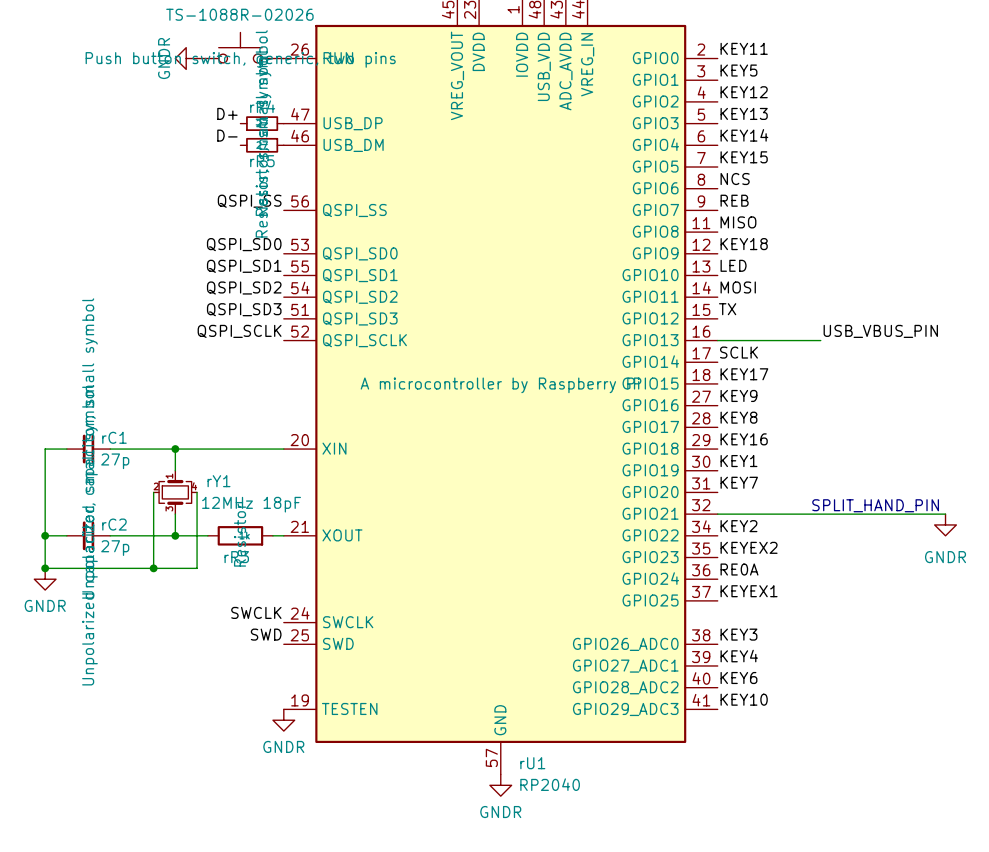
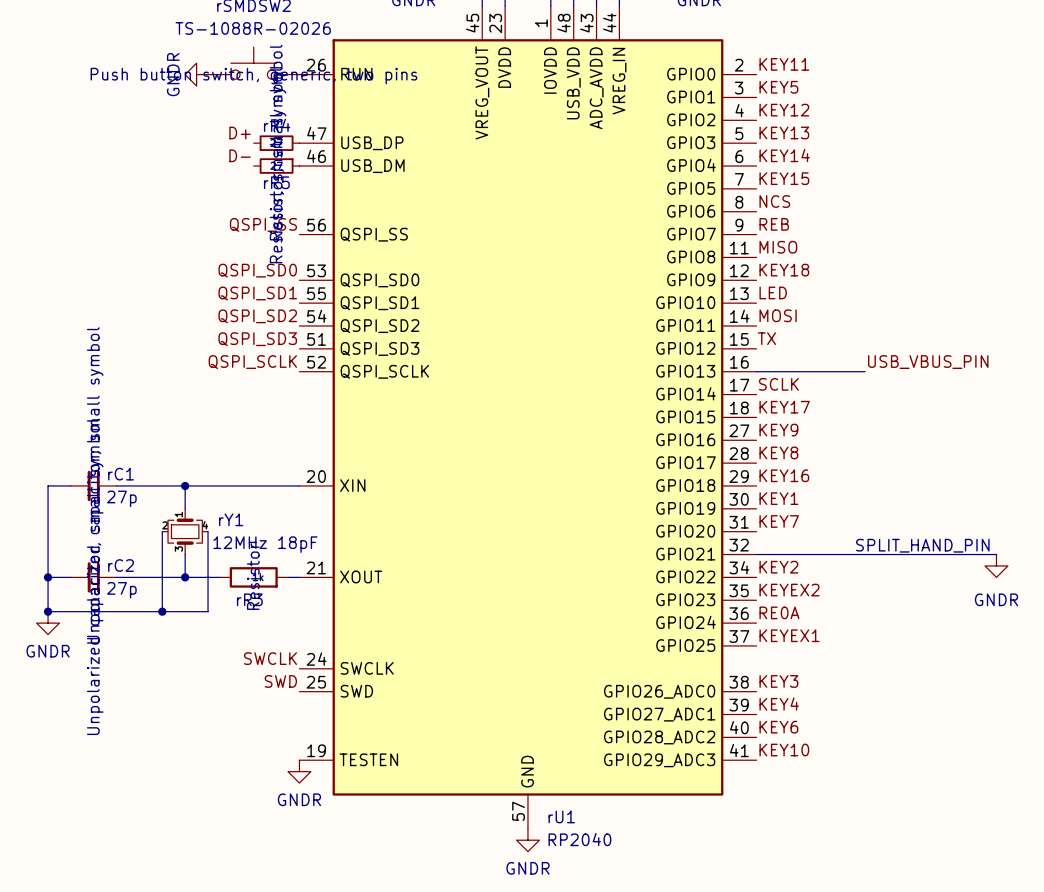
rU1 text: A microcontroller by Raspberry Pi (500, 385) -> none

